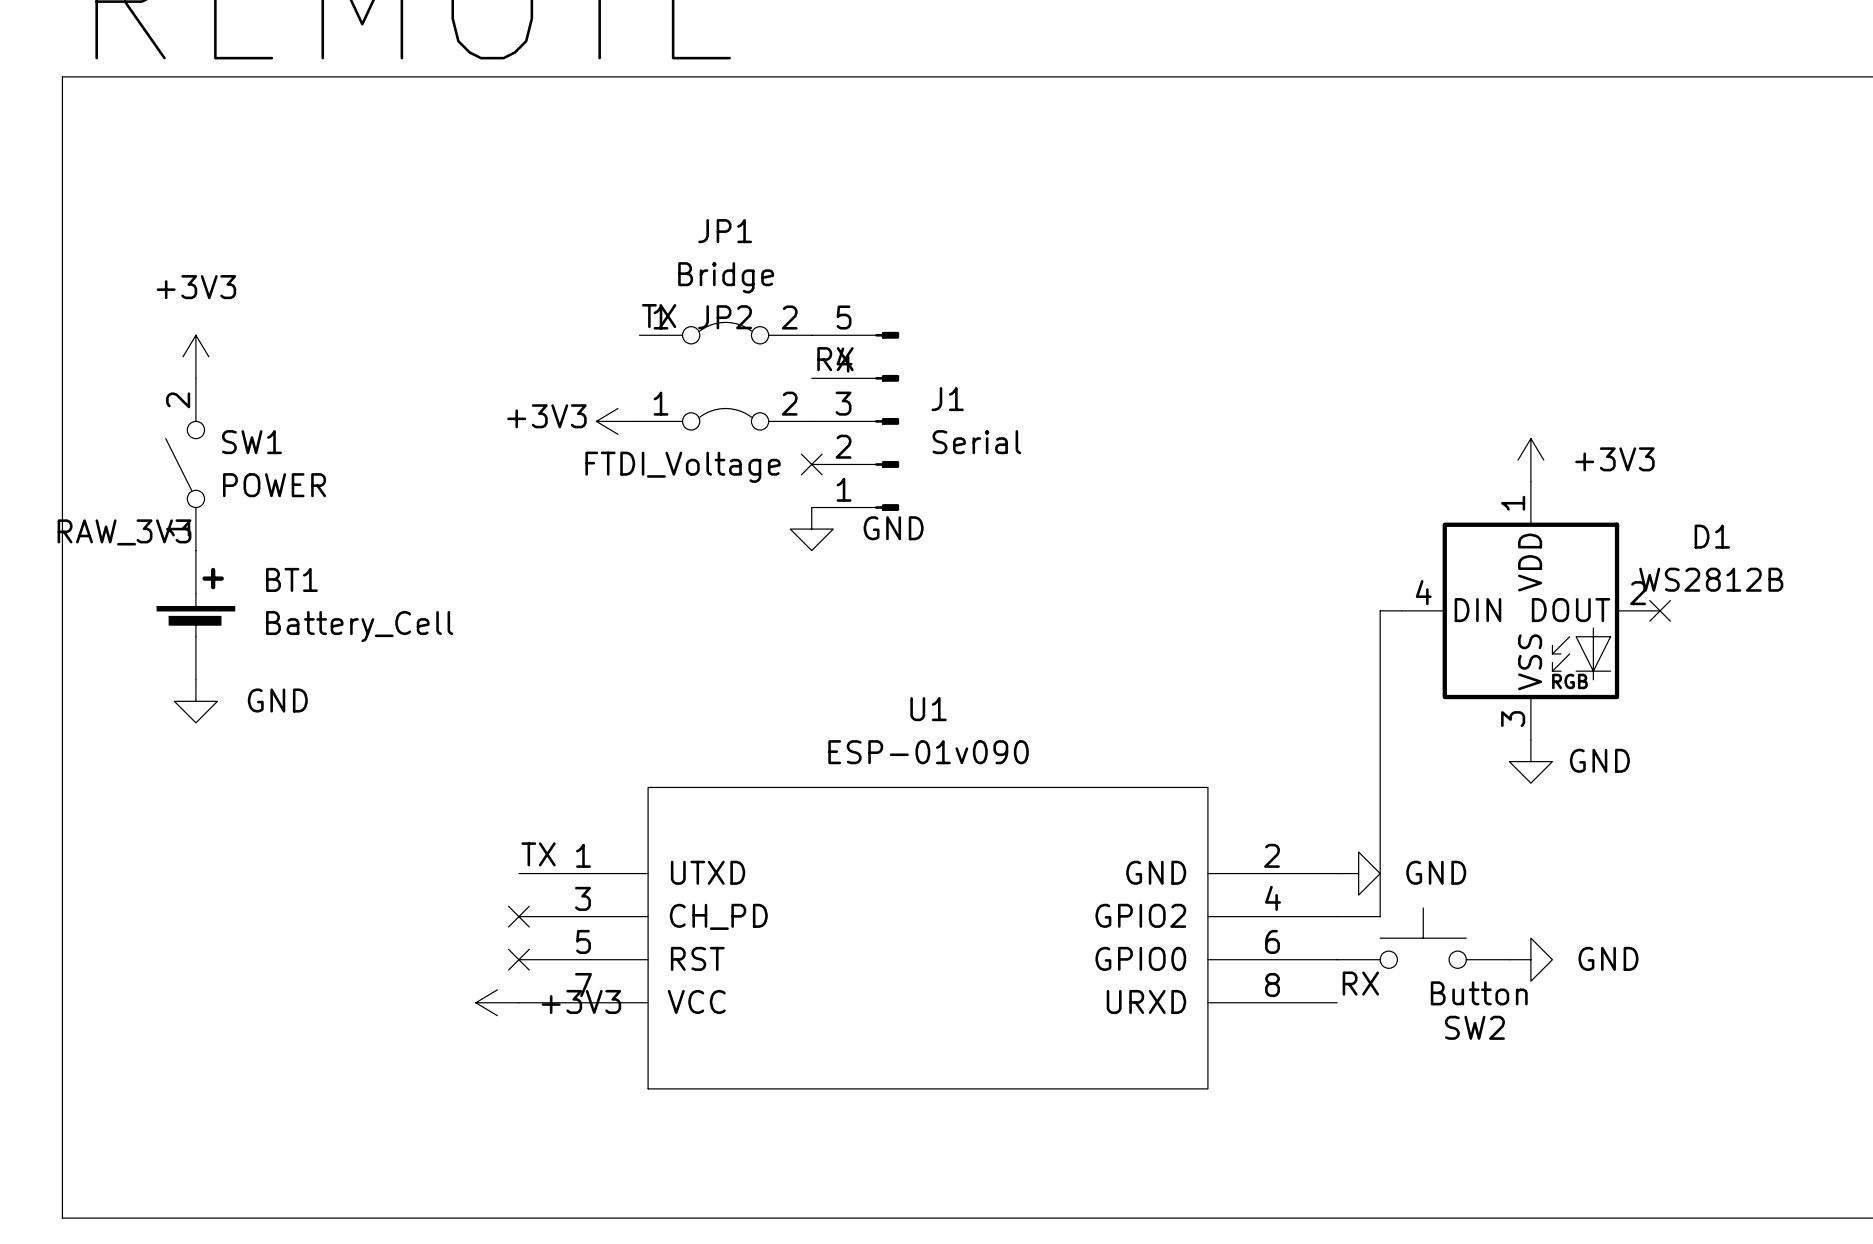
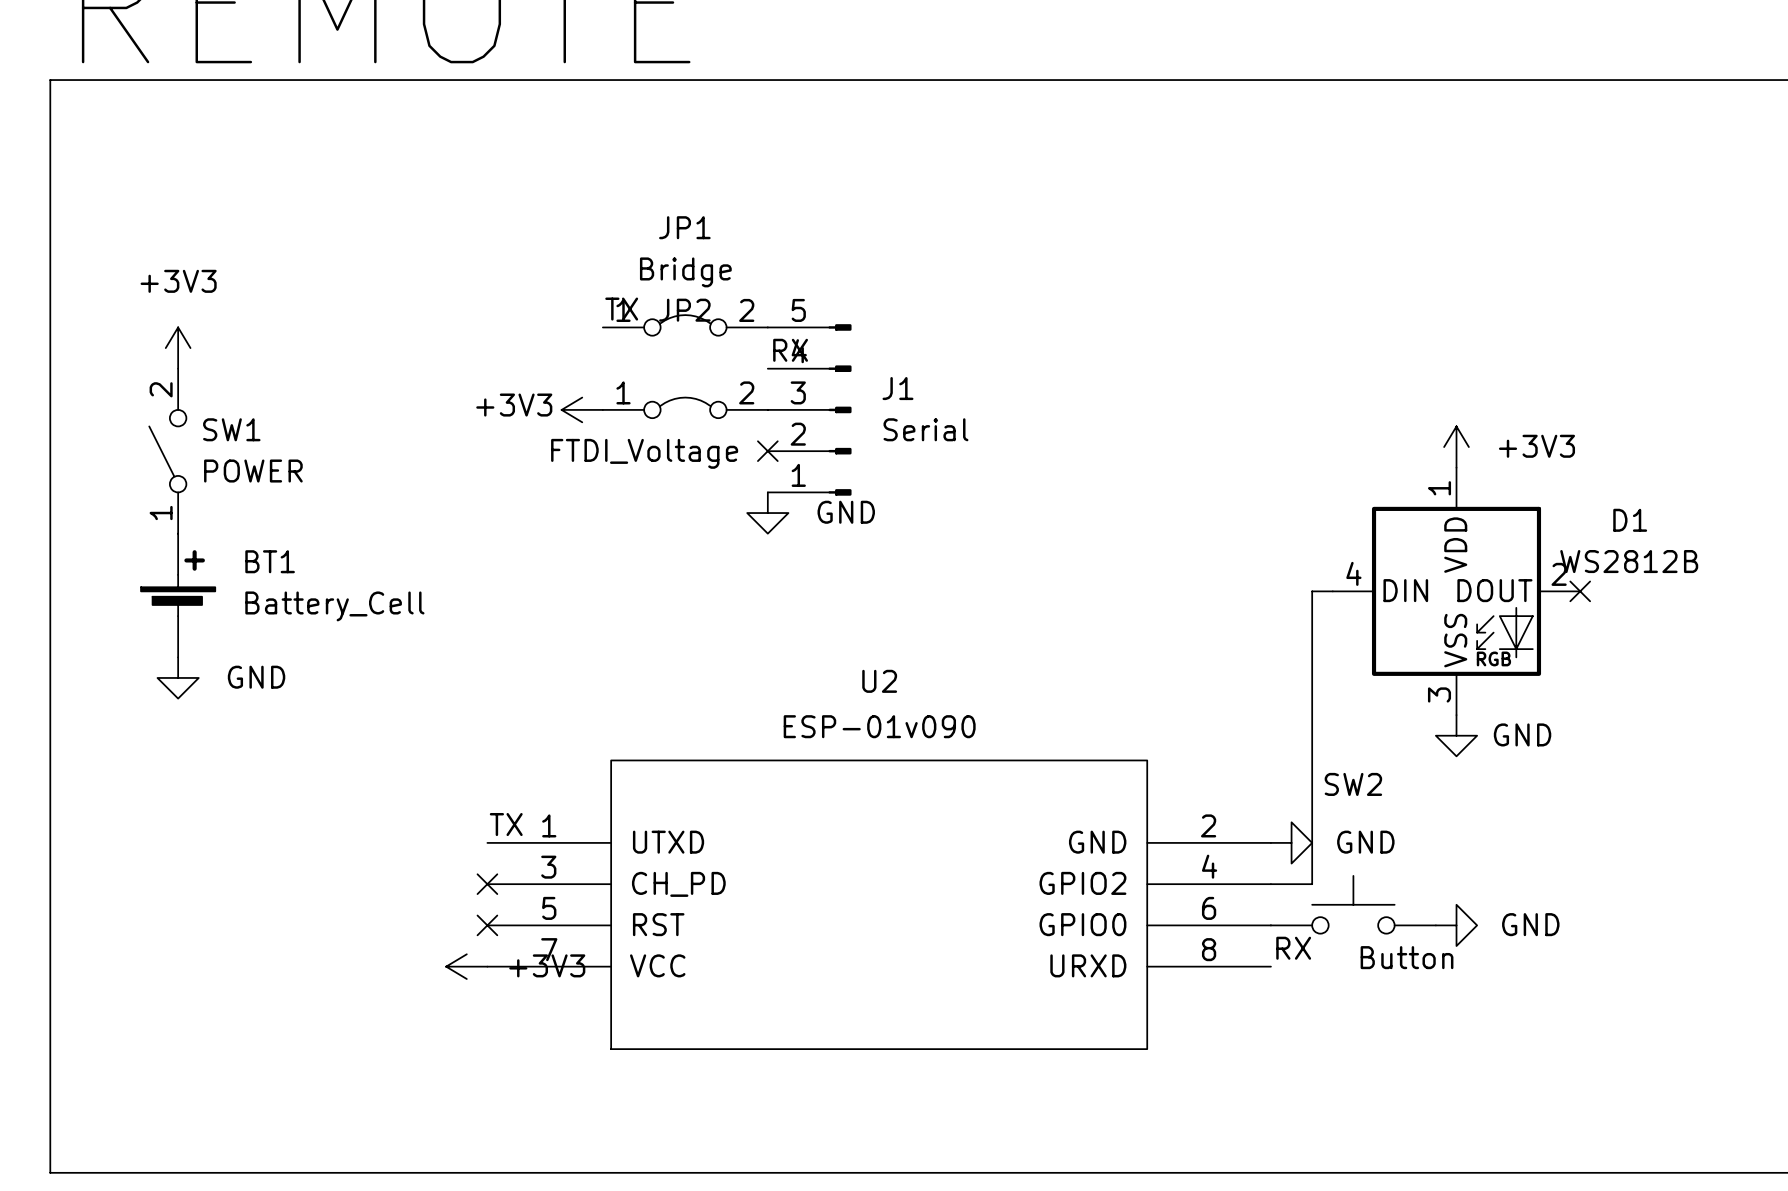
label: RAW_3V3 (124, 532) -> none
U1 name: U1 (928, 709) -> U2 (879, 681)
SW2 name position: SW2 (1474, 1027) -> SW2 (1353, 784)

